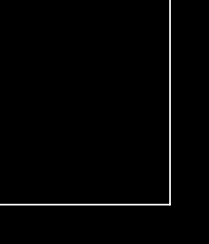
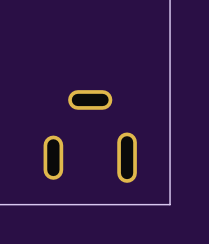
part: none -> (90, 136)

